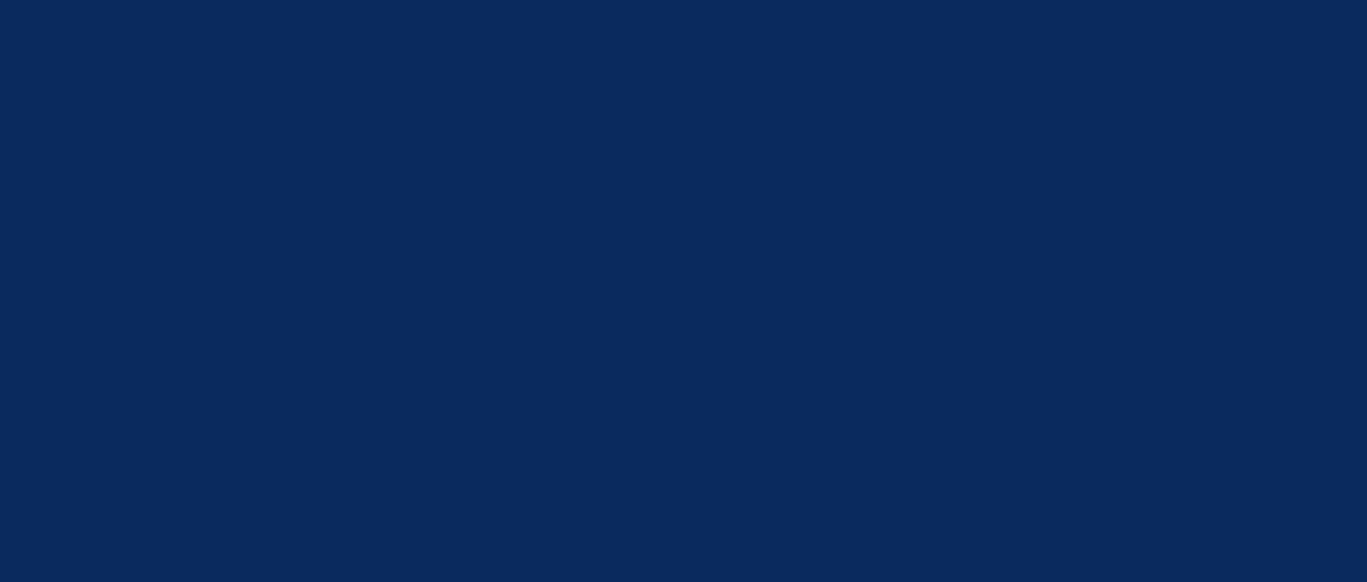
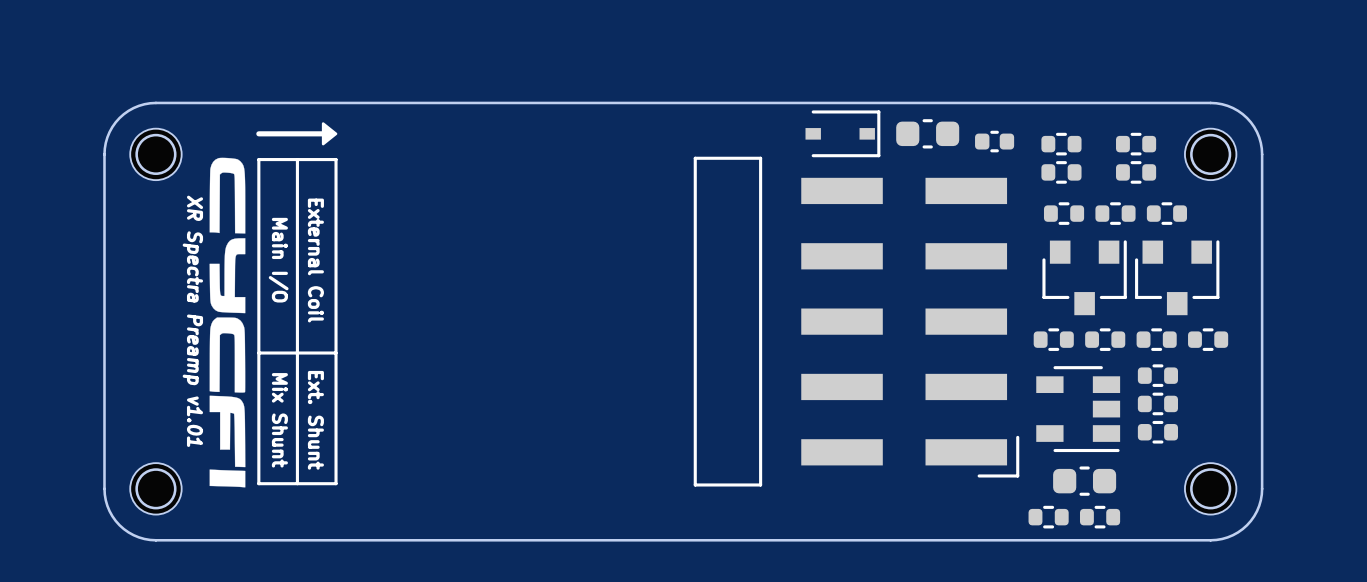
board edge: none -> (155, 102) (1210, 102) (1227, 105) (1238, 110) (1250, 122) (1257, 132) (1261, 148) (1262, 488) (1259, 505) (1250, 520) (1238, 532) (1222, 539) (1210, 540) (155, 540) (138, 537) (128, 532) (115, 520) (107, 505) (104, 494) (104, 154) (109, 132) (119, 118) (138, 105) (155, 102)
drawing: none -> [321, 122, 338, 146]
round board edge: none -> [135, 133, 177, 175]
line: none -> (258, 133) (328, 133)
part: none -> (842, 133)
part: none -> (927, 133)
round board edge: none -> [1190, 133, 1232, 175]
part: none -> (994, 141)
part: none -> (1061, 144)
part: none -> (1136, 144)
part: none -> (155, 154)
part: none -> (1210, 154)
drawing: none -> [209, 157, 246, 488]
line: none -> (258, 159) (258, 483) (336, 483) (336, 159) (258, 159)
line: none -> (297, 159) (297, 483)
part: none -> (1061, 172)
part: none -> (1136, 172)
part: none -> (1064, 213)
part: none -> (1115, 213)
part: none -> (1166, 213)
text: none -> Main I/O (278, 260)
text: none -> External Coil (315, 260)
part: none -> (1084, 277)
part: none -> (1177, 277)
text: none -> XR Spectra Preamp v1.01 (192, 321)
part: none -> (856, 321)
part: none -> (1053, 339)
part: none -> (1105, 339)
part: none -> (1156, 339)
part: none -> (1208, 339)
line: none -> (258, 353) (336, 353)
part: none -> (1157, 375)
part: none -> (1157, 403)
part: none -> (1078, 409)
text: none -> Mix Shunt (279, 420)
text: none -> Ext. Shunt (315, 420)
part: none -> (1157, 432)
round board edge: none -> [135, 468, 177, 510]
round board edge: none -> [1190, 468, 1232, 510]
part: none -> (1084, 481)
part: none -> (155, 488)
part: none -> (1210, 488)
part: none -> (1048, 517)
part: none -> (1100, 517)

